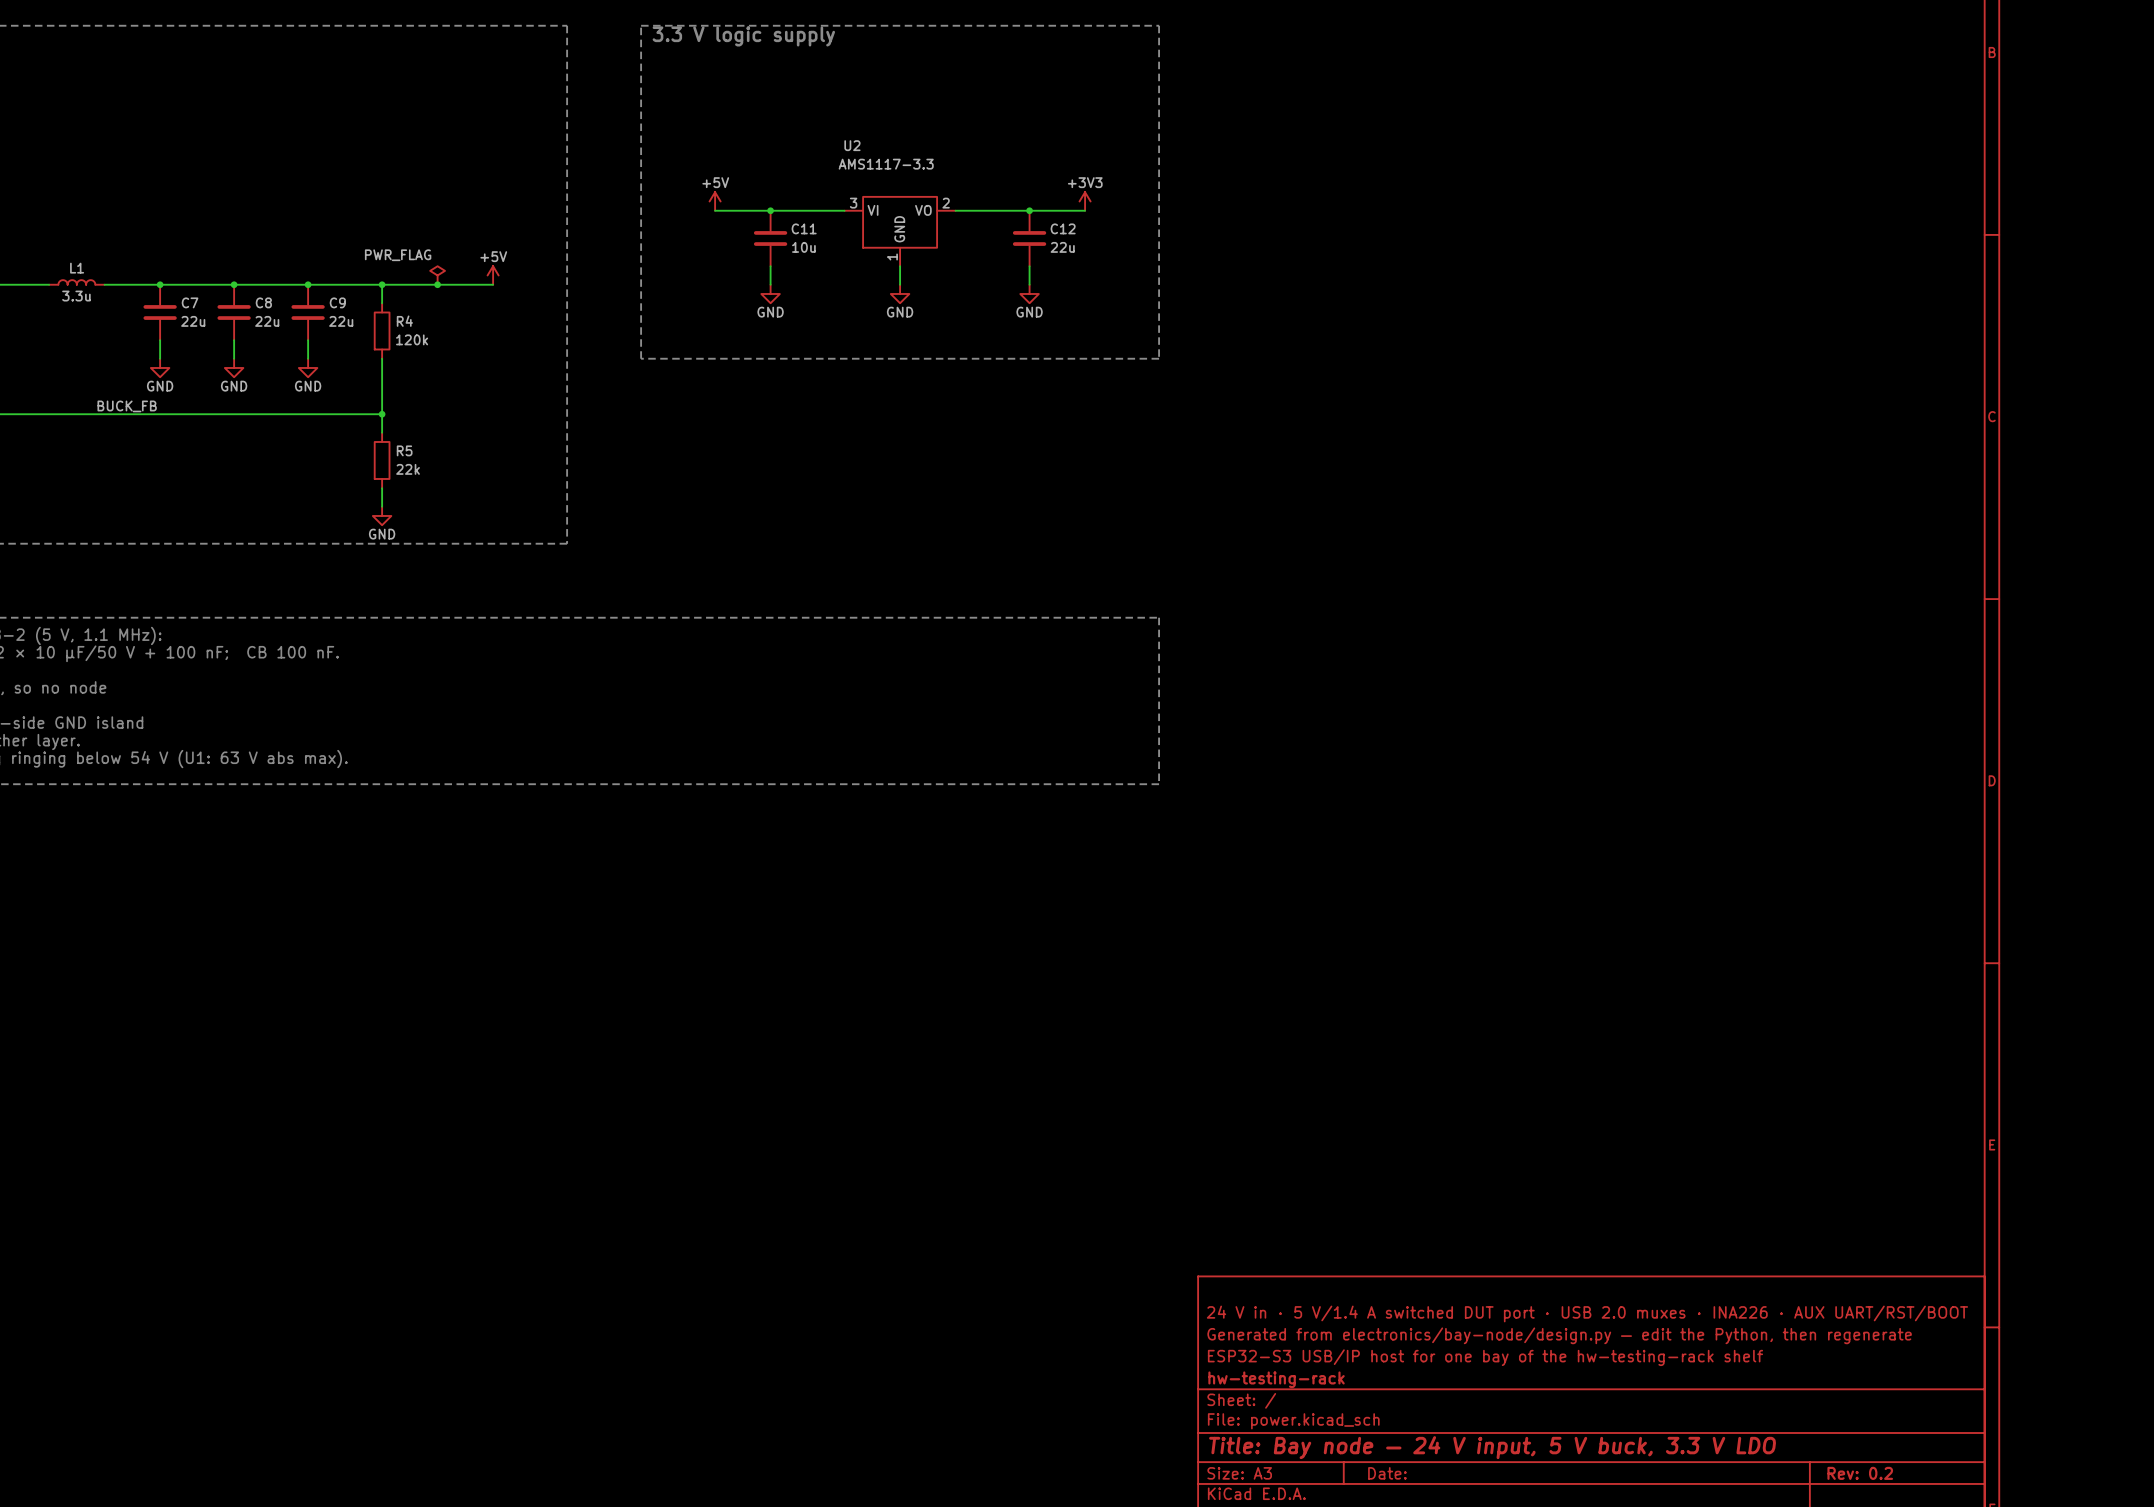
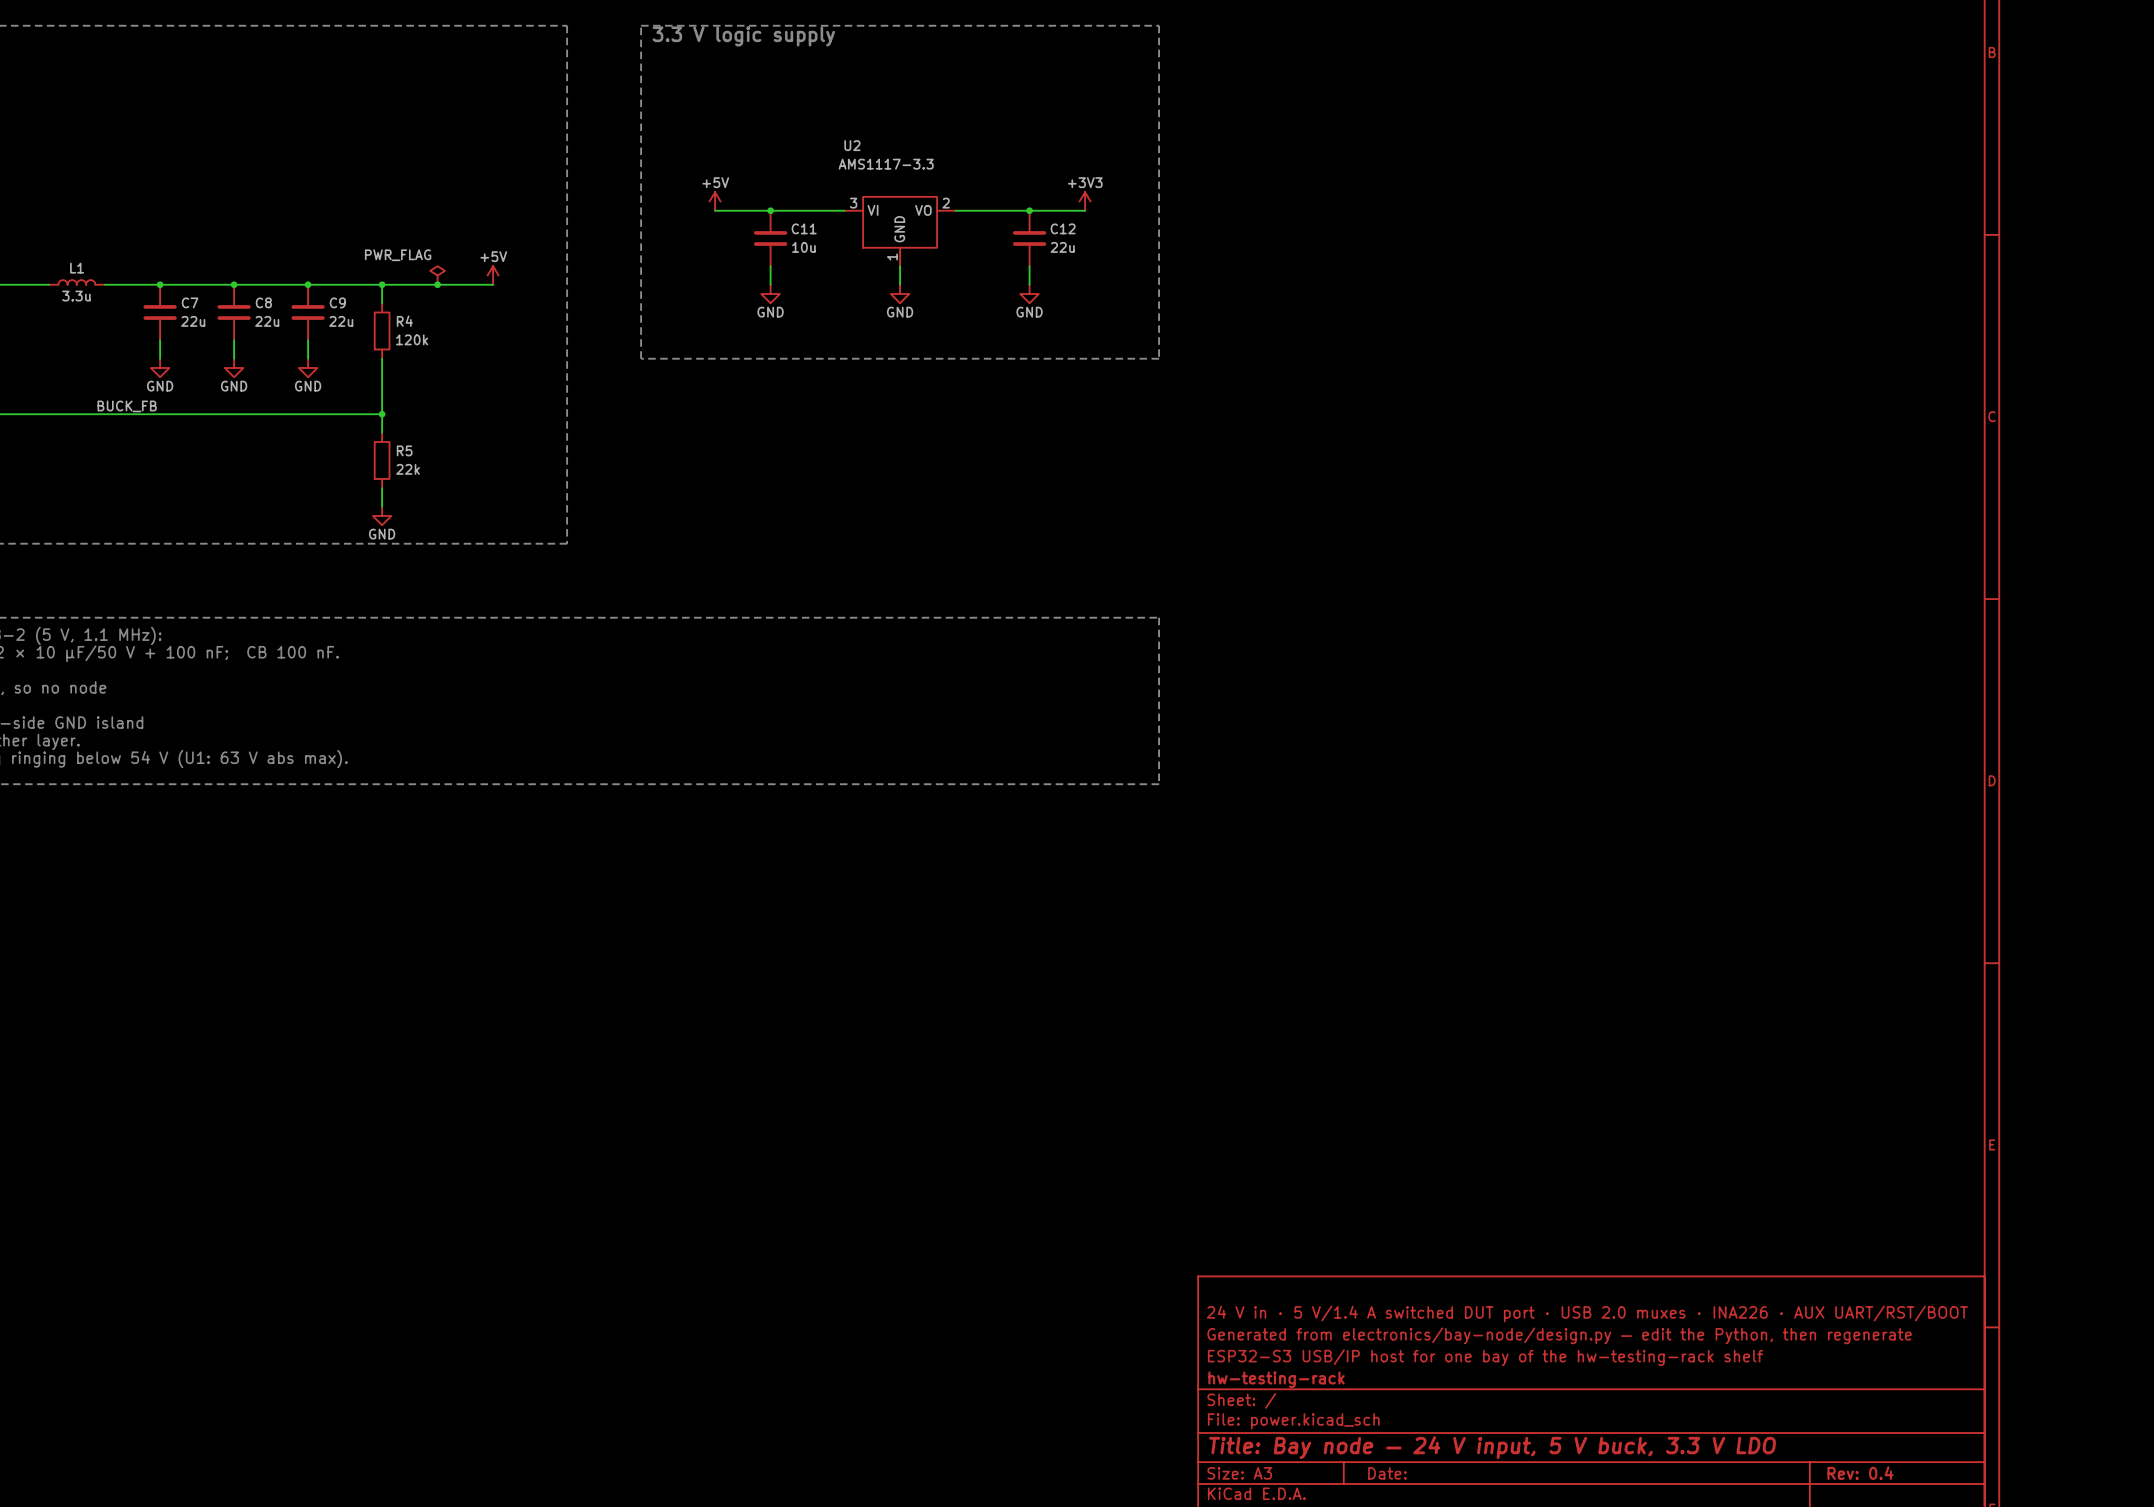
title block: Rev: 0.2 (1860, 1473) -> Rev: 0.4 (1860, 1473)

